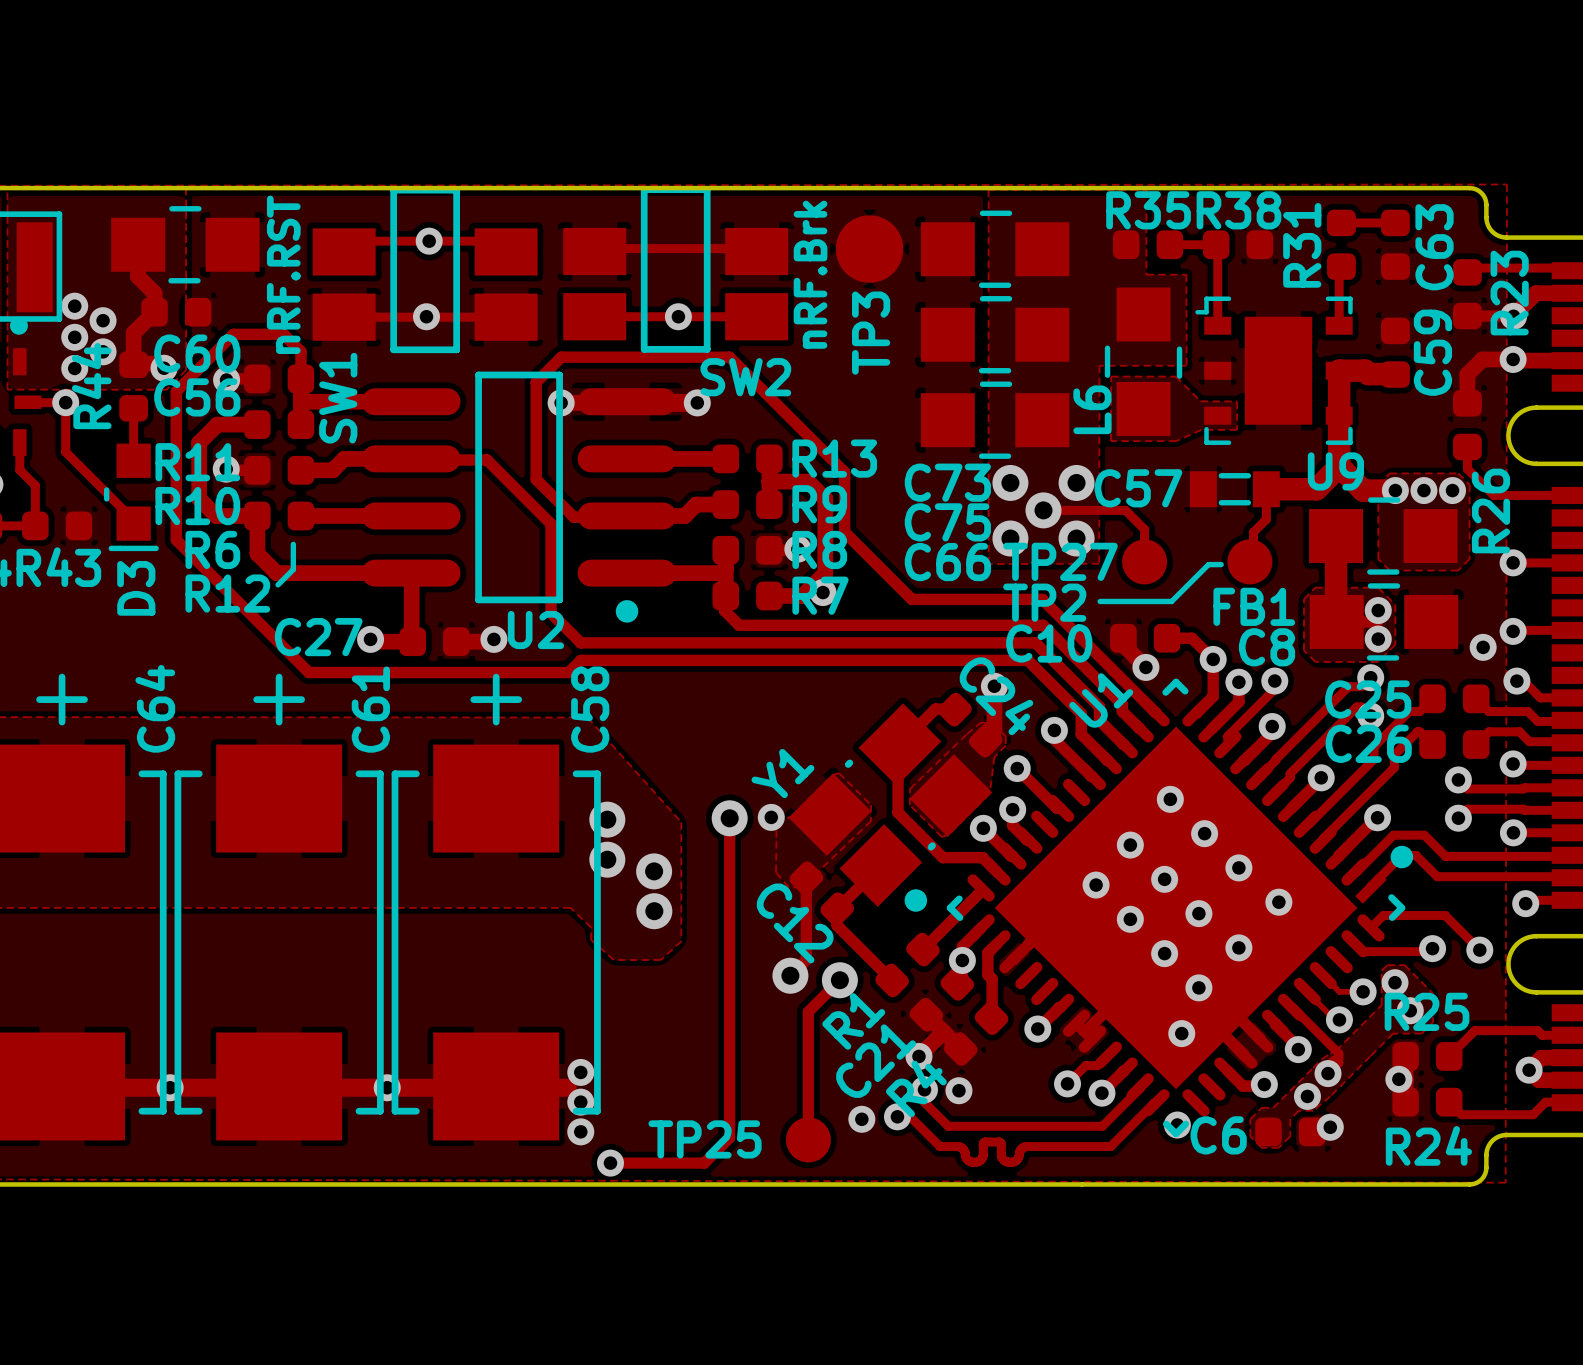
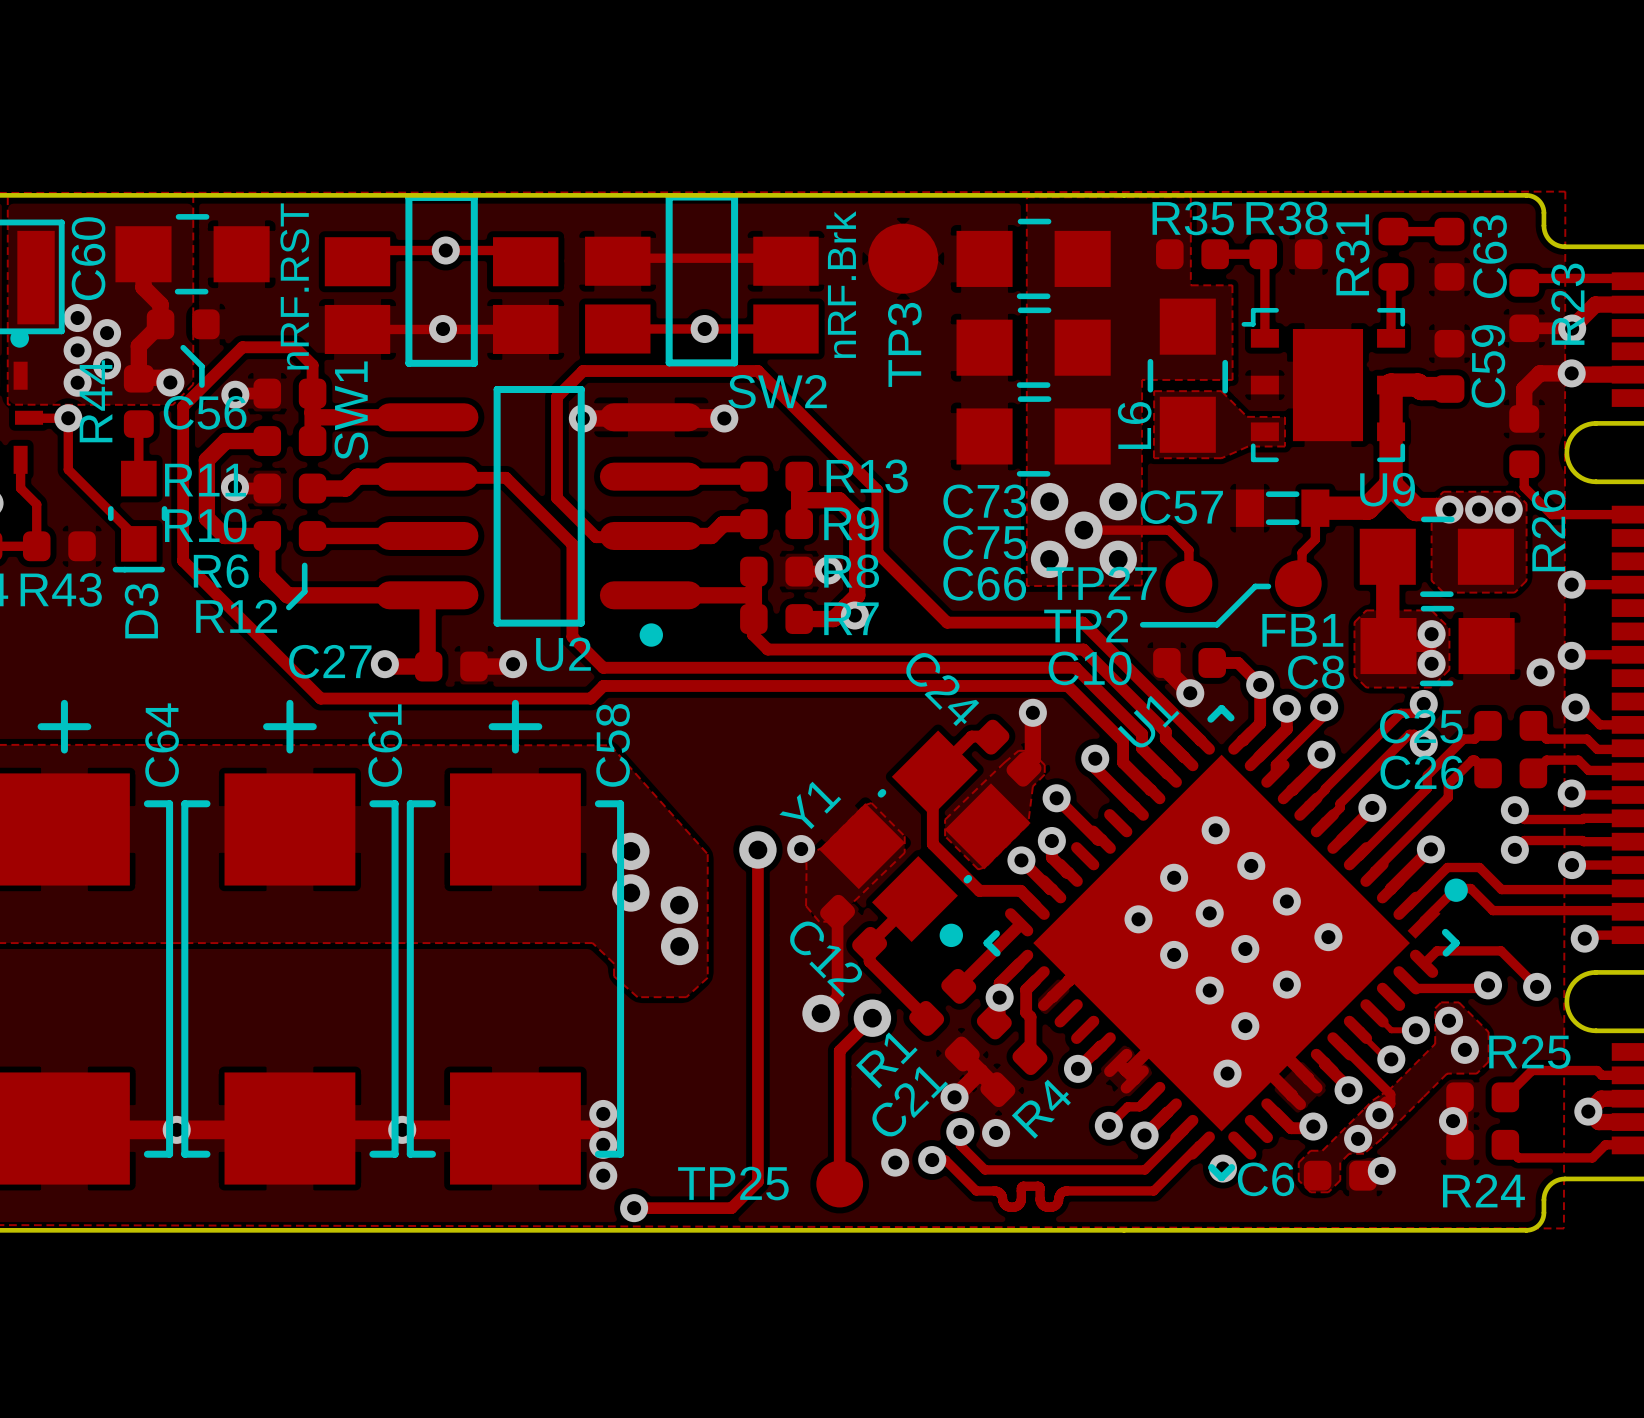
line: none -> (183, 347) (201, 366) (201, 385)
C60 name rotation: 0° (197, 353) -> 90° counterclockwise (88, 258)
C60 name position: C60 (197, 353) -> C60 (88, 258)
C24 name position: C24 (996, 696) -> C24 (942, 689)
R25 name position: R25 (1427, 1011) -> R25 (1529, 1052)
R4 name position: R4 (916, 1088) -> R4 (1041, 1109)

